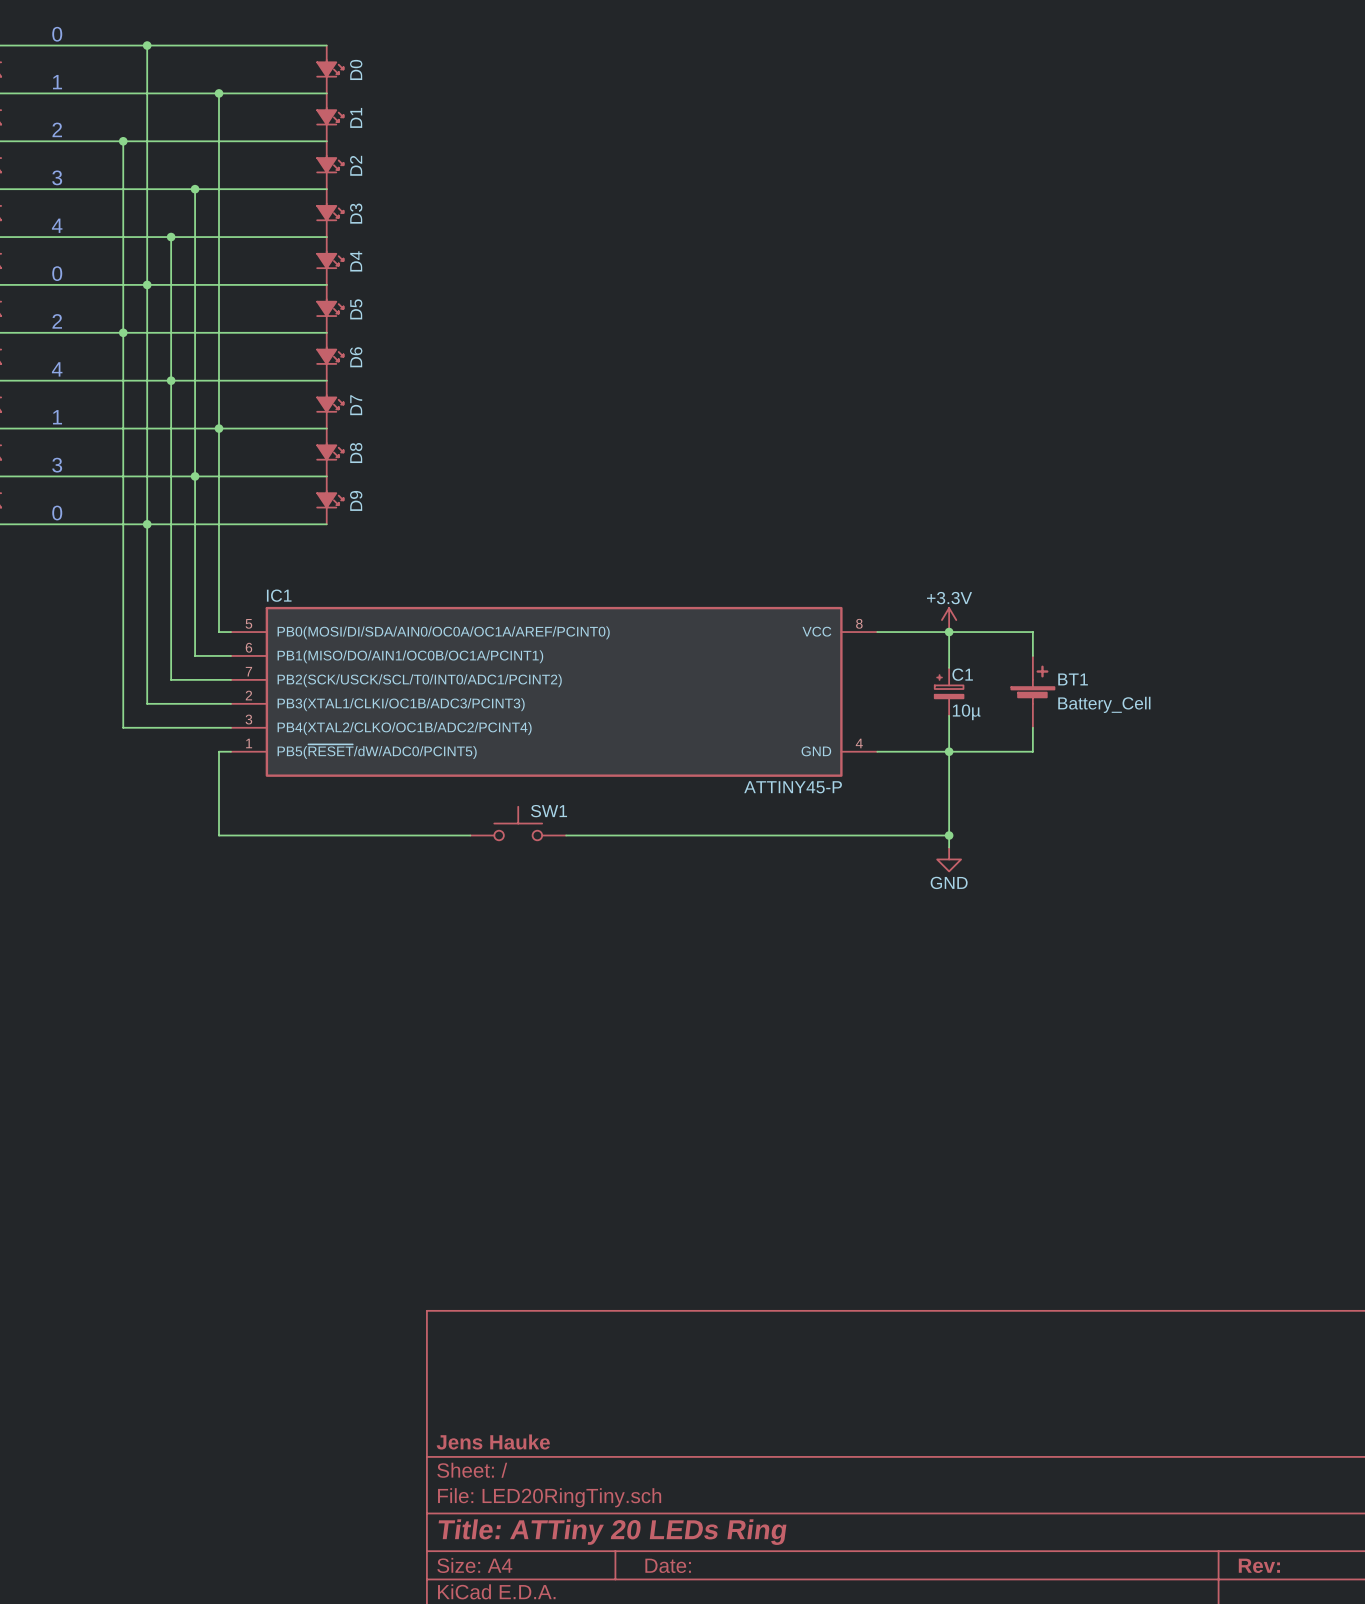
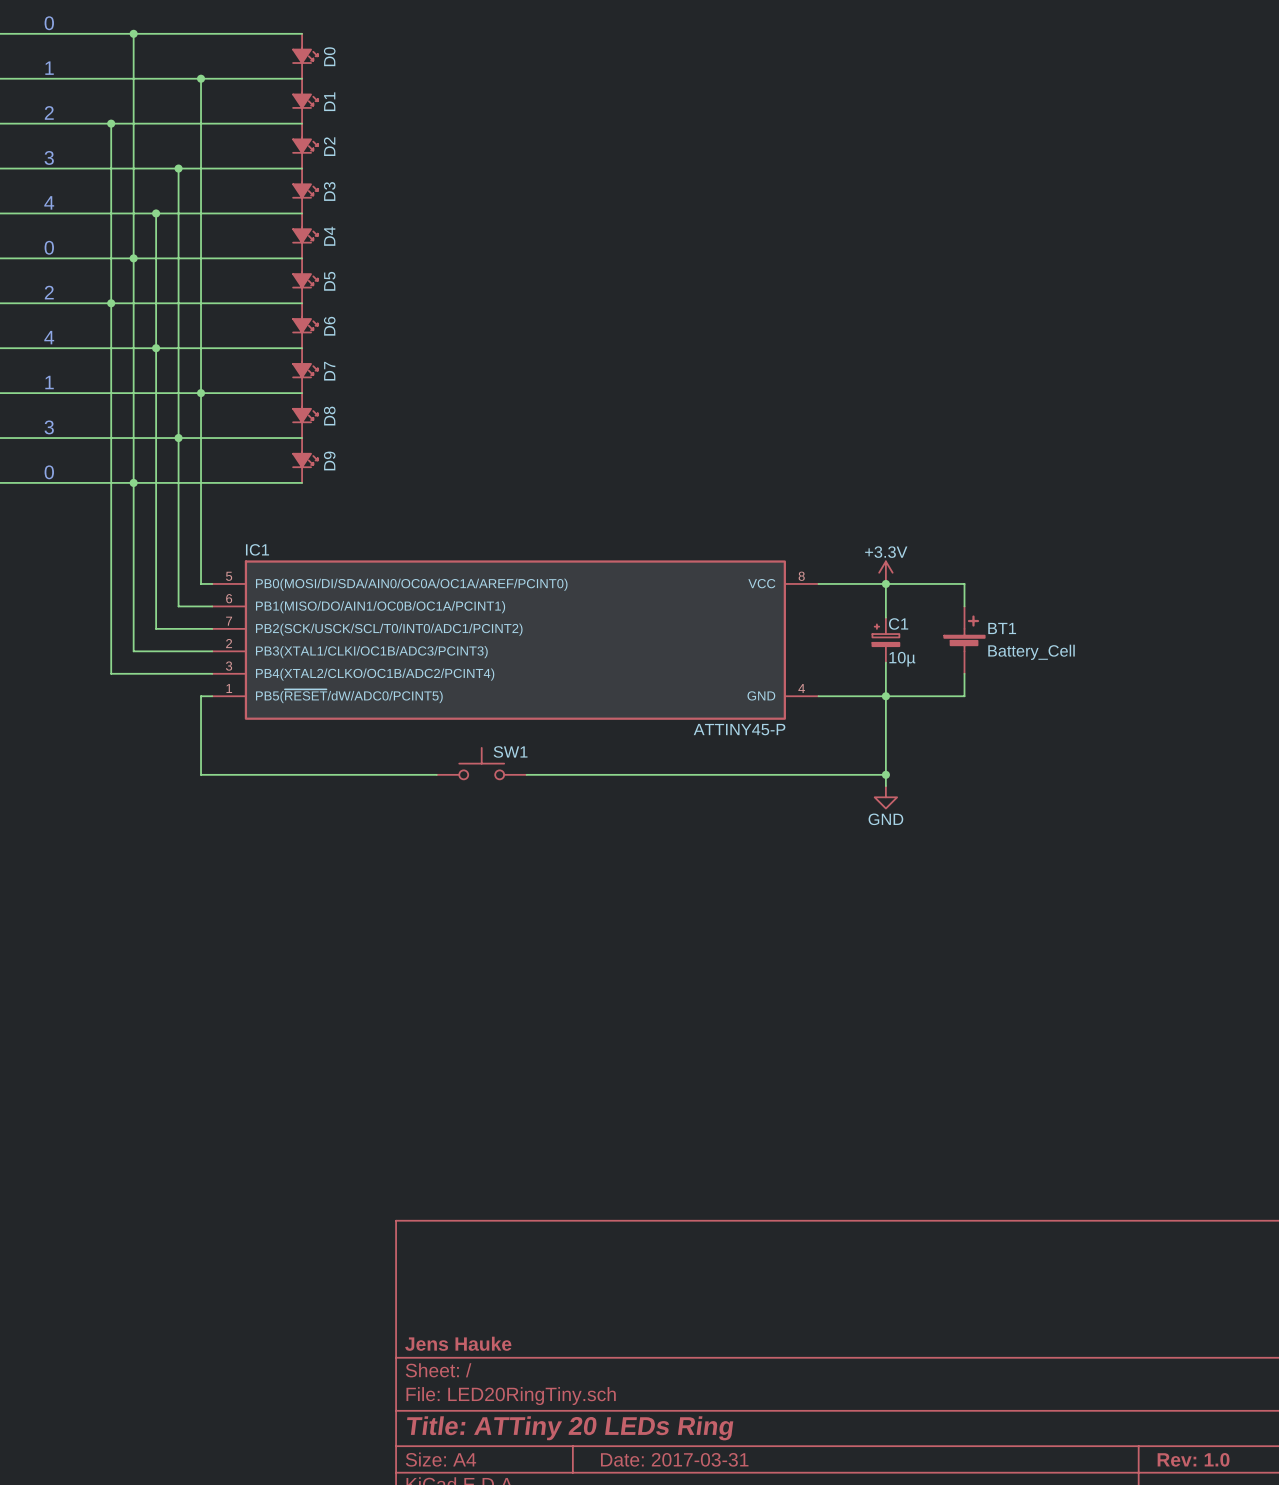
title block: Date: (668, 1565) -> Date: 2017-03-31 (674, 1459)
title block: Rev: (1259, 1565) -> Rev: 1.0 (1193, 1459)

